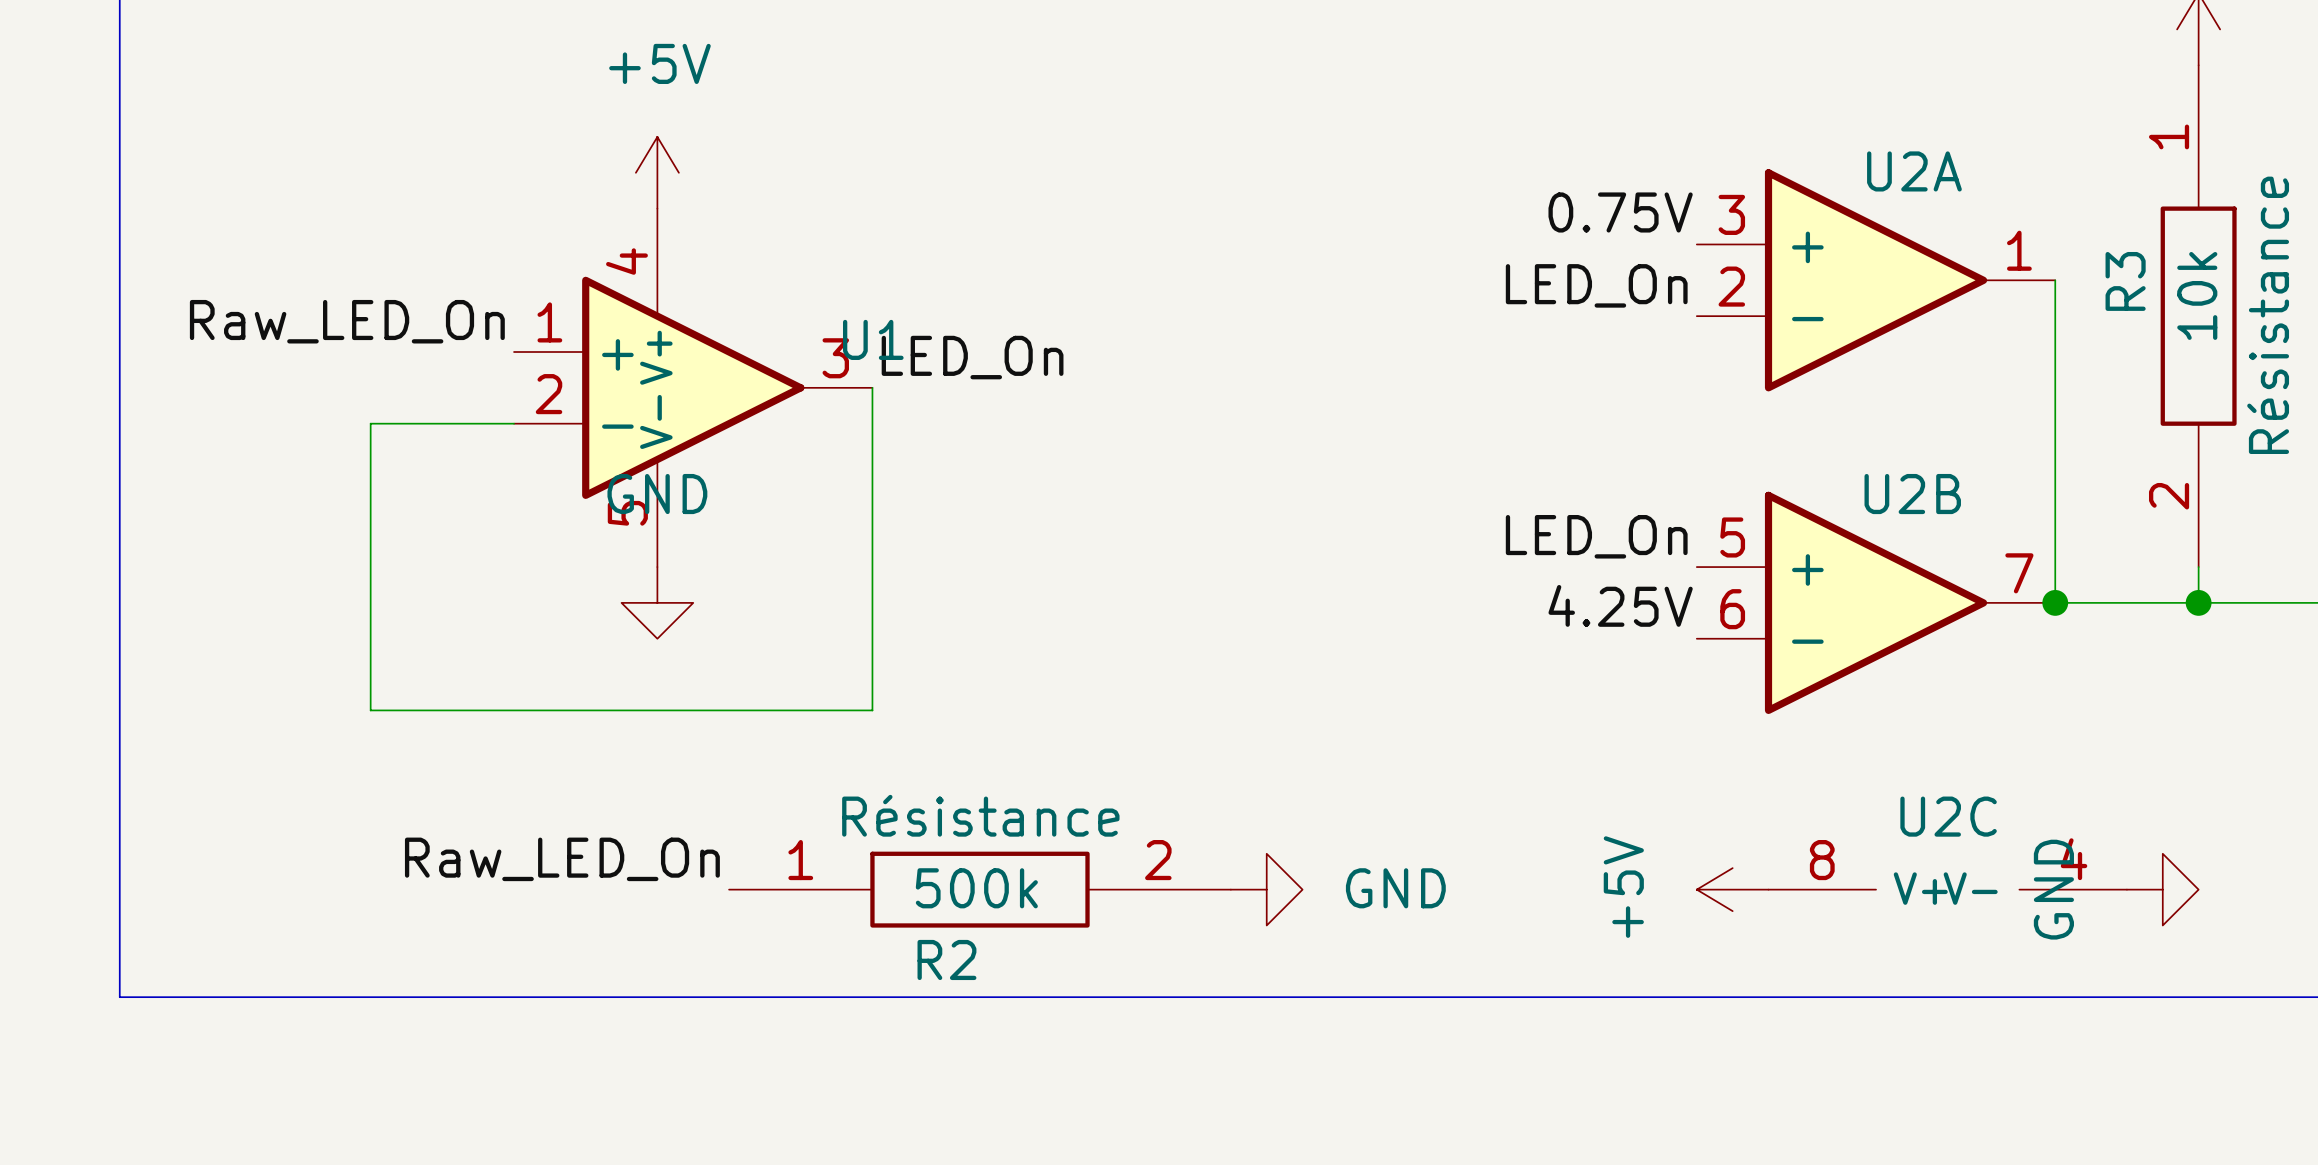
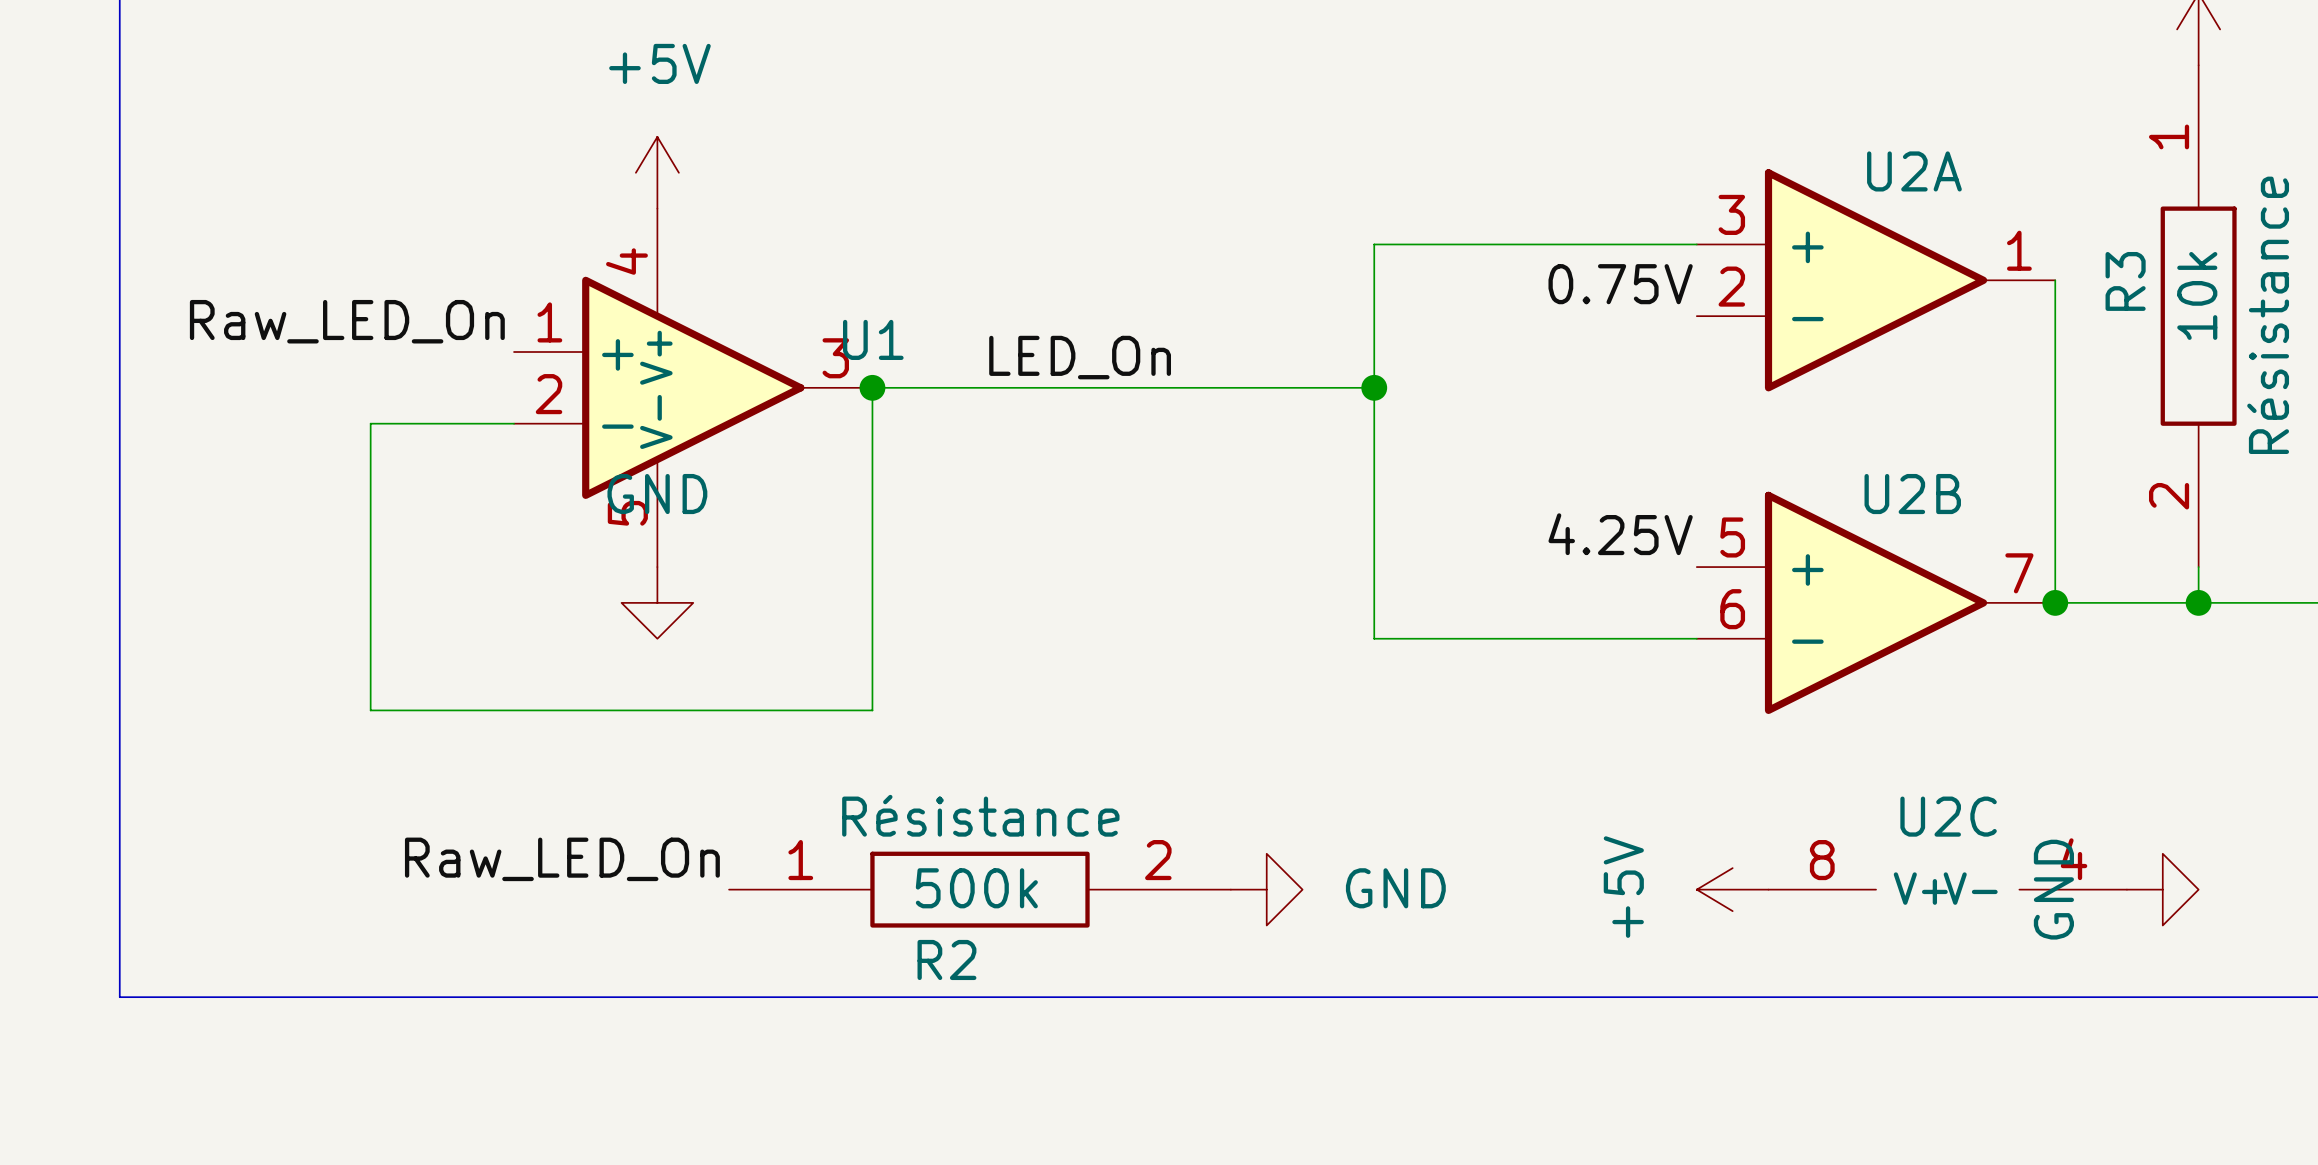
label: 0.75V (1620, 212) -> none
wire: none -> (1696, 244) (1374, 244) (1374, 638) (1696, 638)
label: LED_On (1596, 285) -> 0.75V (1620, 284)
label position: LED_On (972, 357) -> LED_On (1080, 357)
wire: none -> (872, 387) (1374, 387)
junction: none -> (872, 387)
junction: none -> (1374, 387)
label: LED_On (1596, 536) -> 4.25V (1620, 534)
label: 4.25V (1620, 605) -> none

